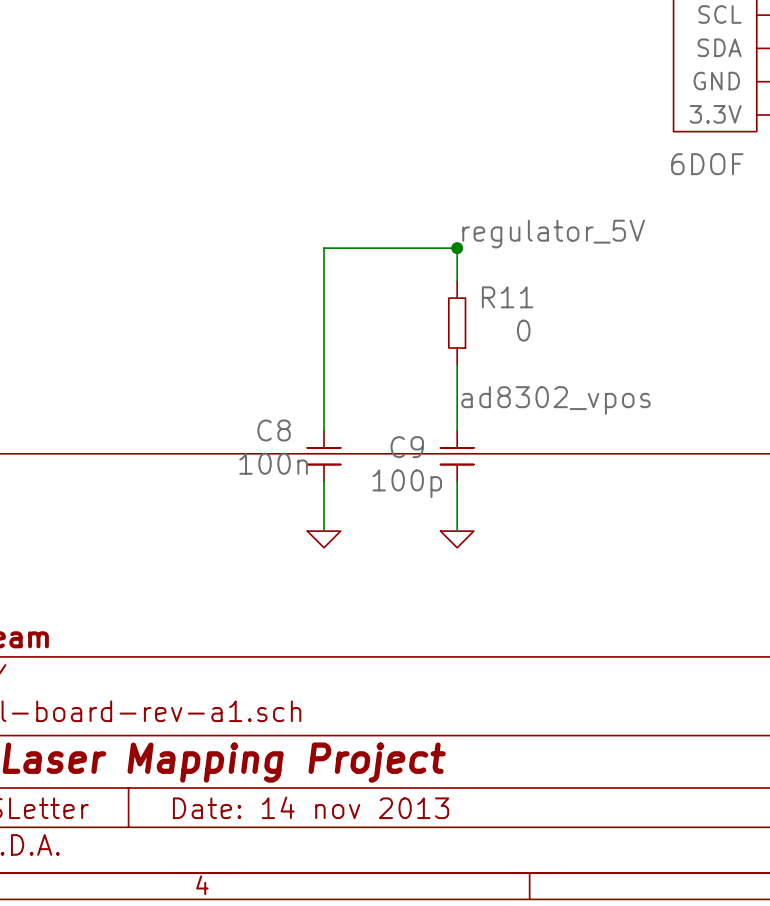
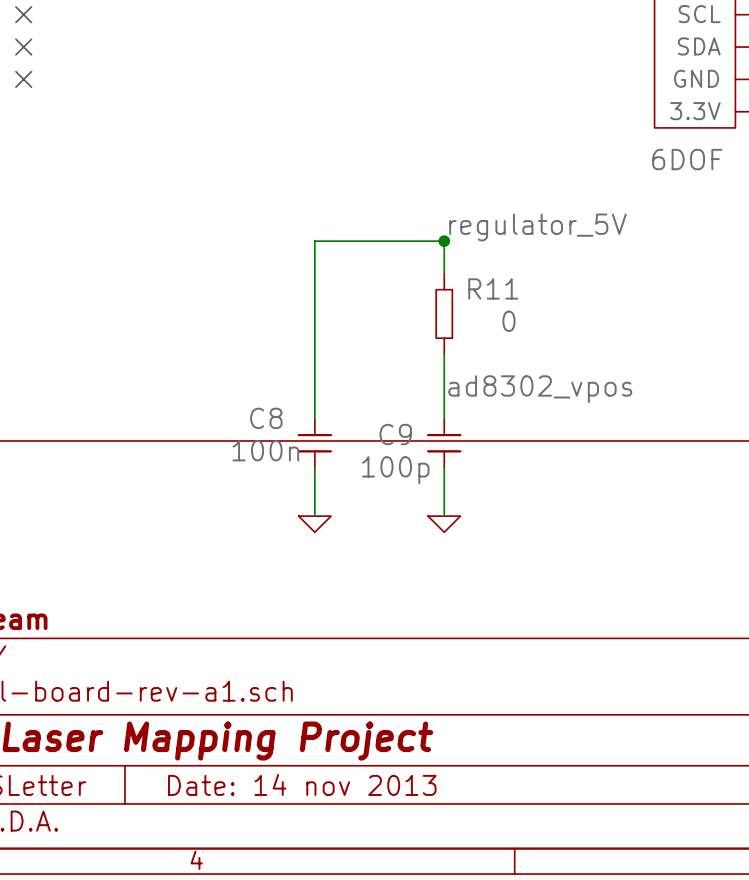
no-connect mark: none -> (23, 14)
no-connect mark: none -> (23, 47)
no-connect mark: none -> (23, 79)

